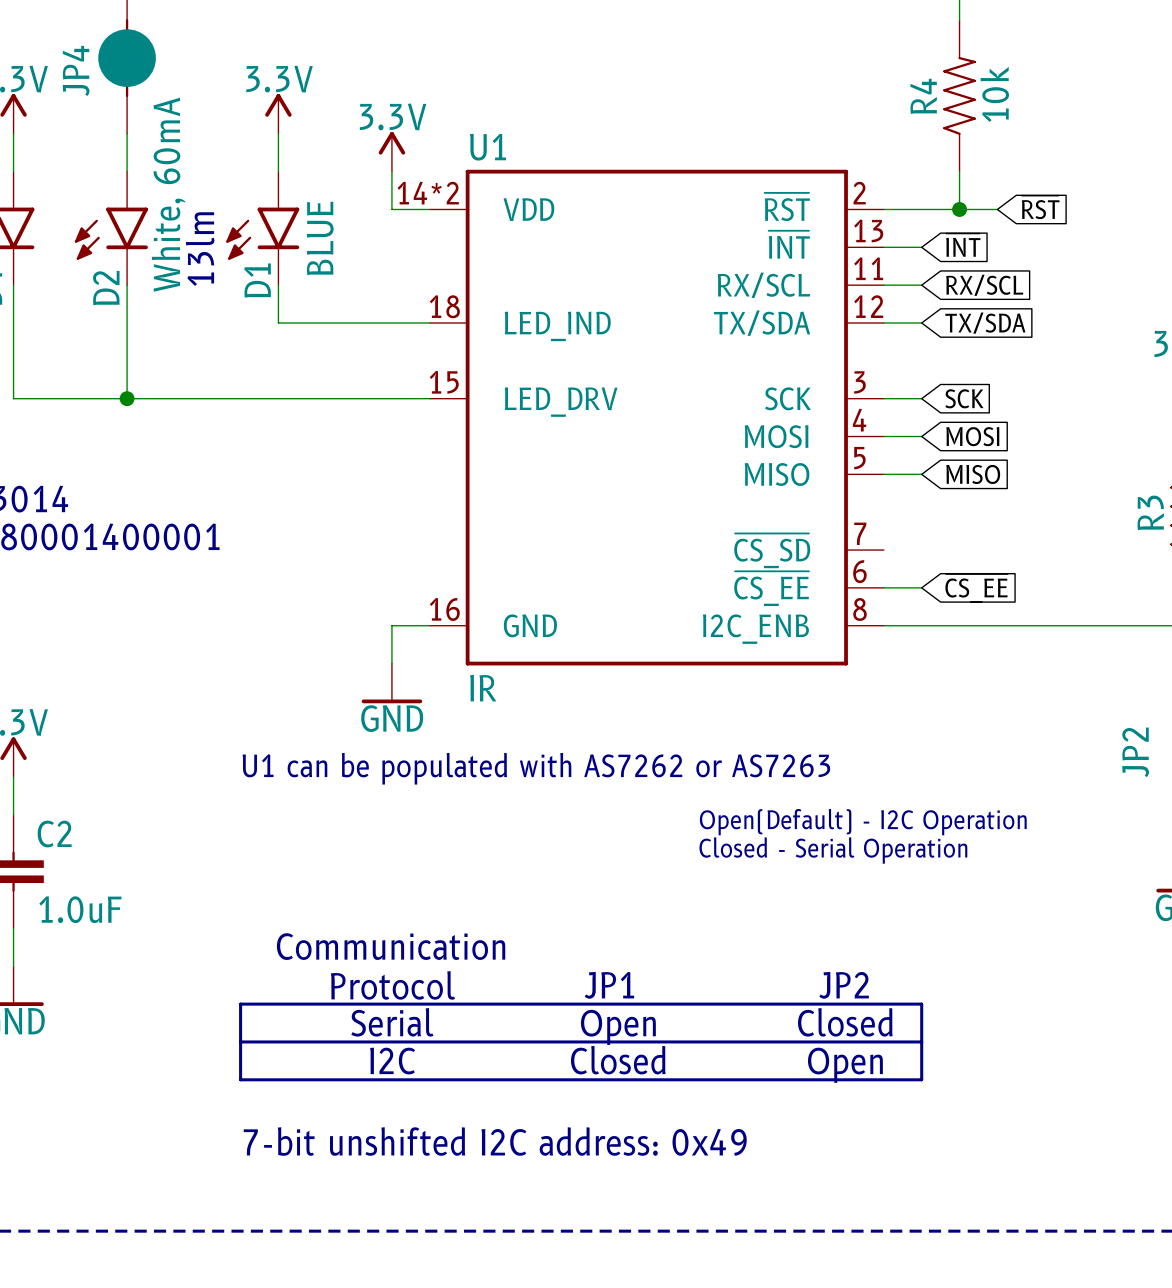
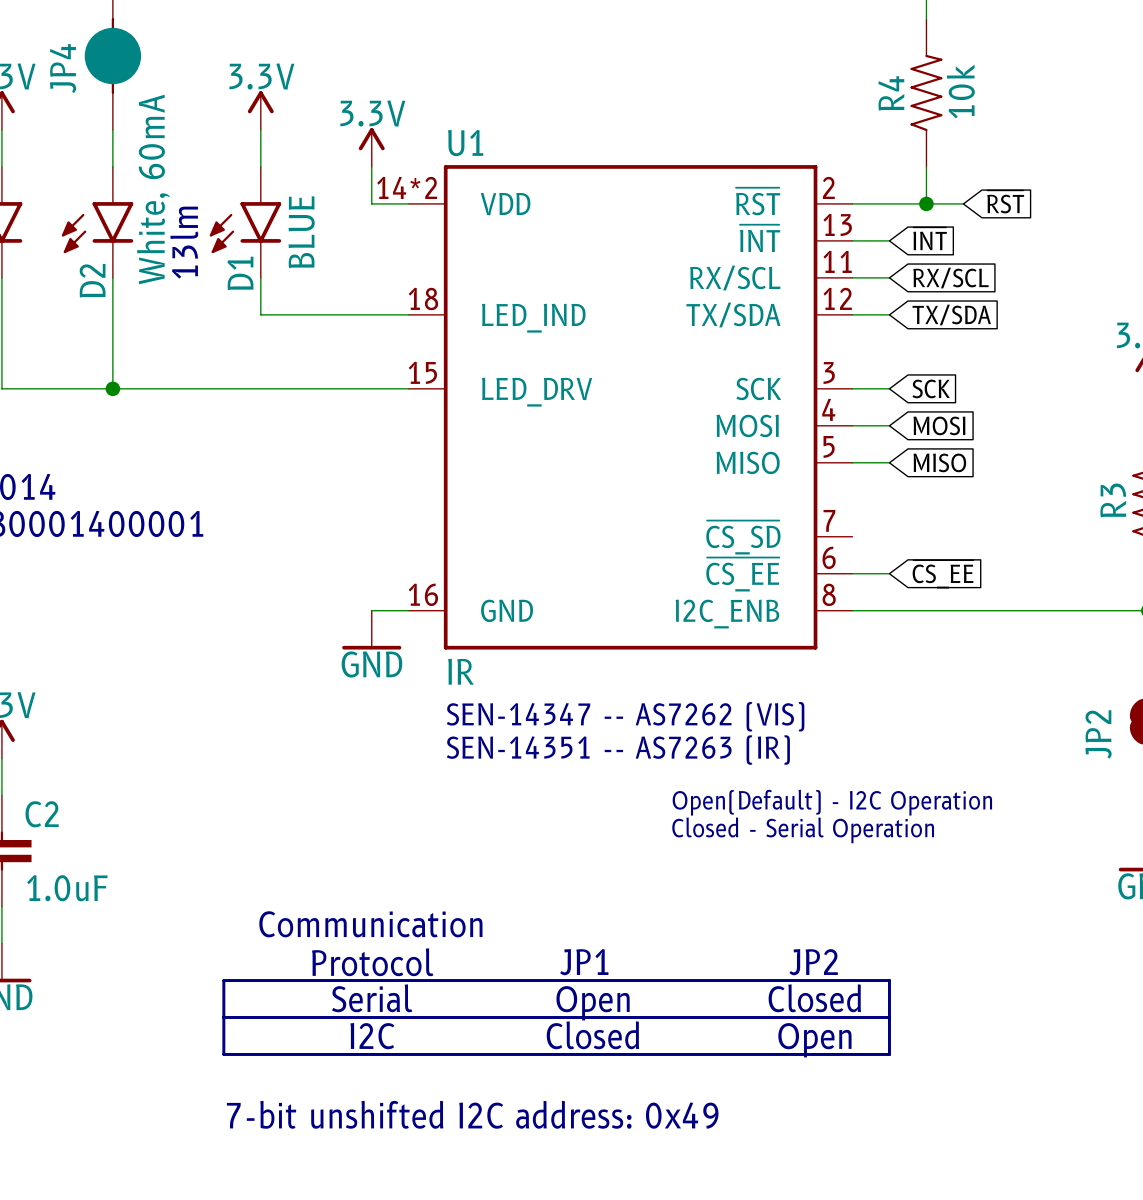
power symbol position: GND (391, 683) -> GND (371, 630)
text: none -> SEN-14347 -- AS7262 (VIS) (625, 716)
text: U1 can be populated with AS7262 or AS7263 (536, 768) -> none
text: none -> SEN-14351 -- AS7263 (IR) (618, 750)

